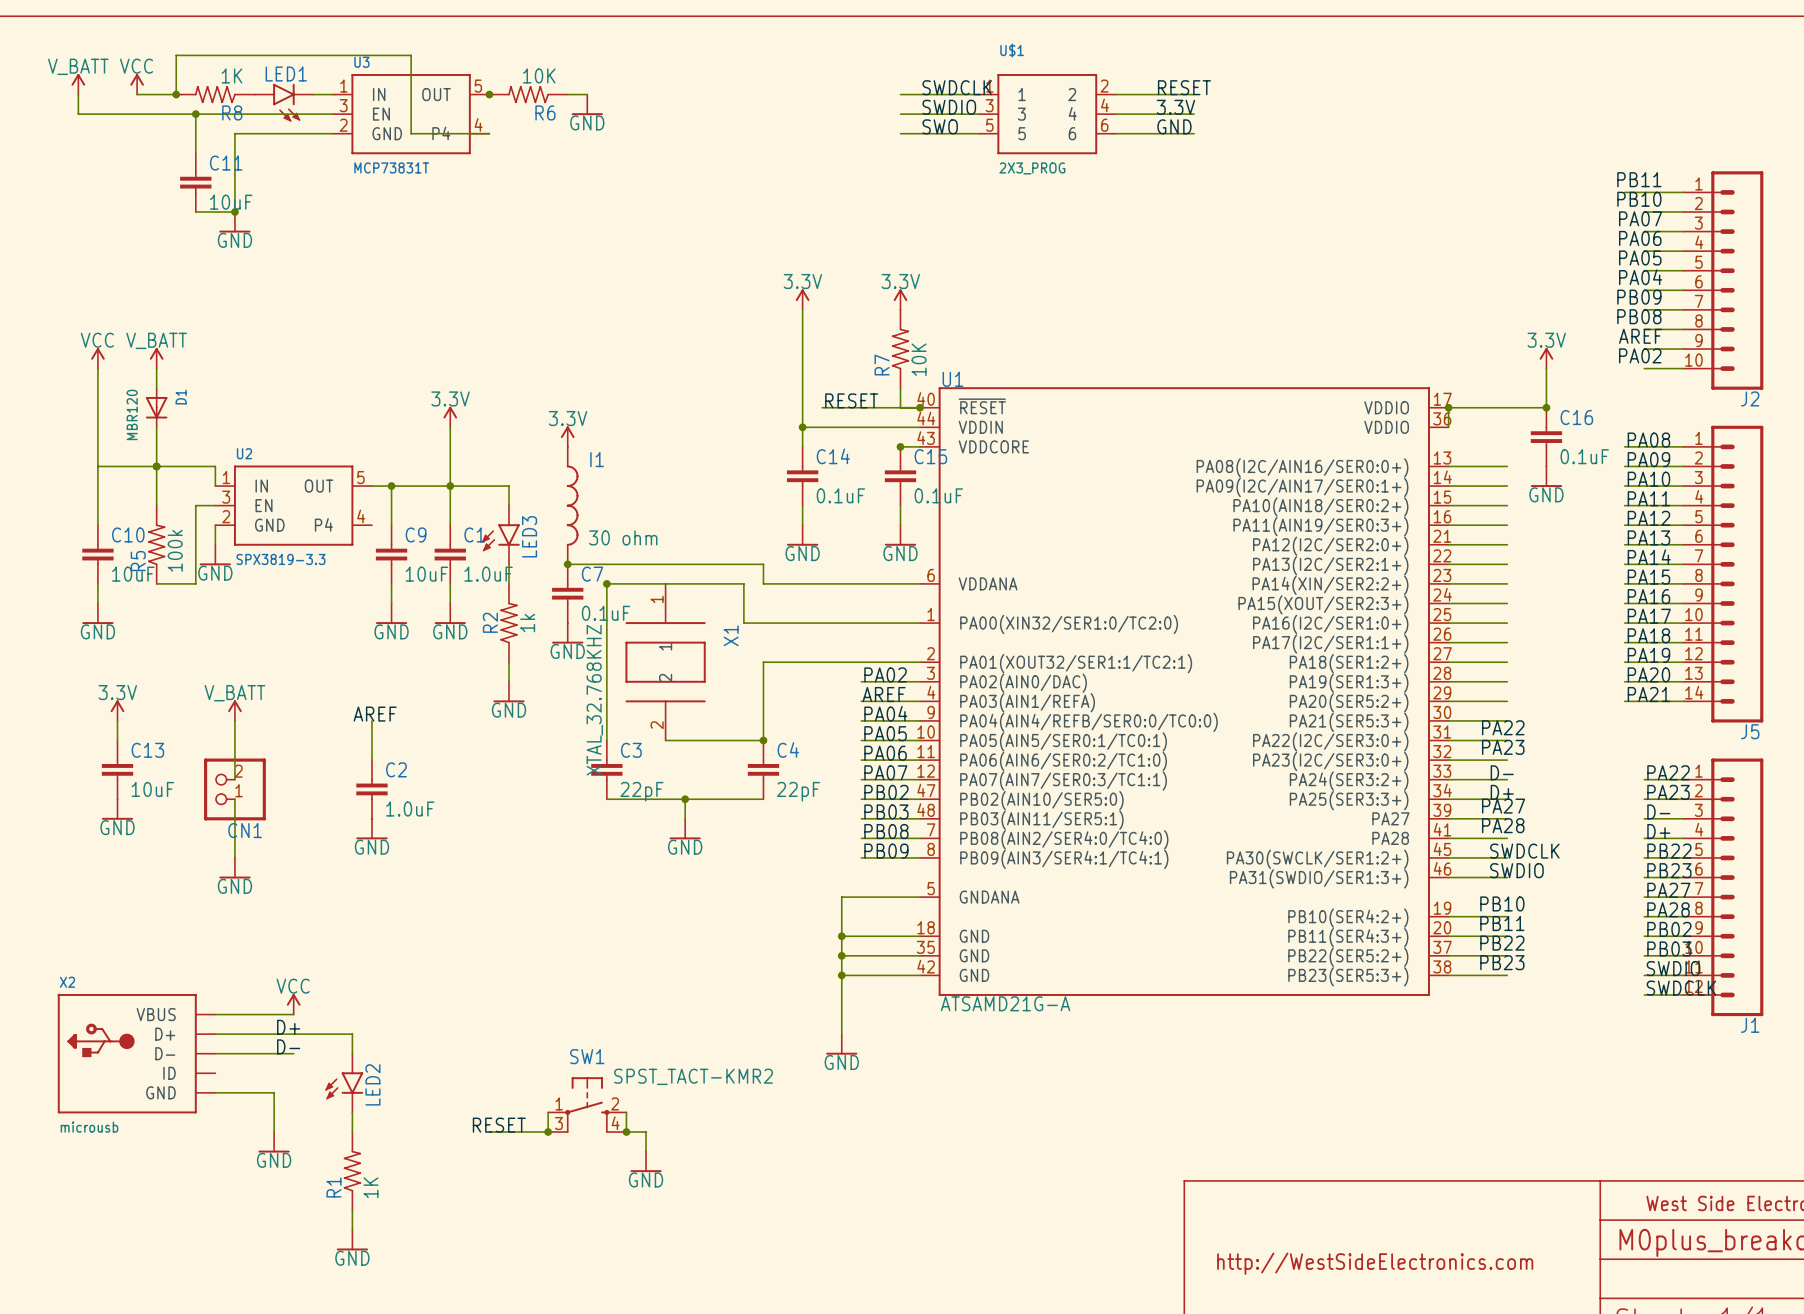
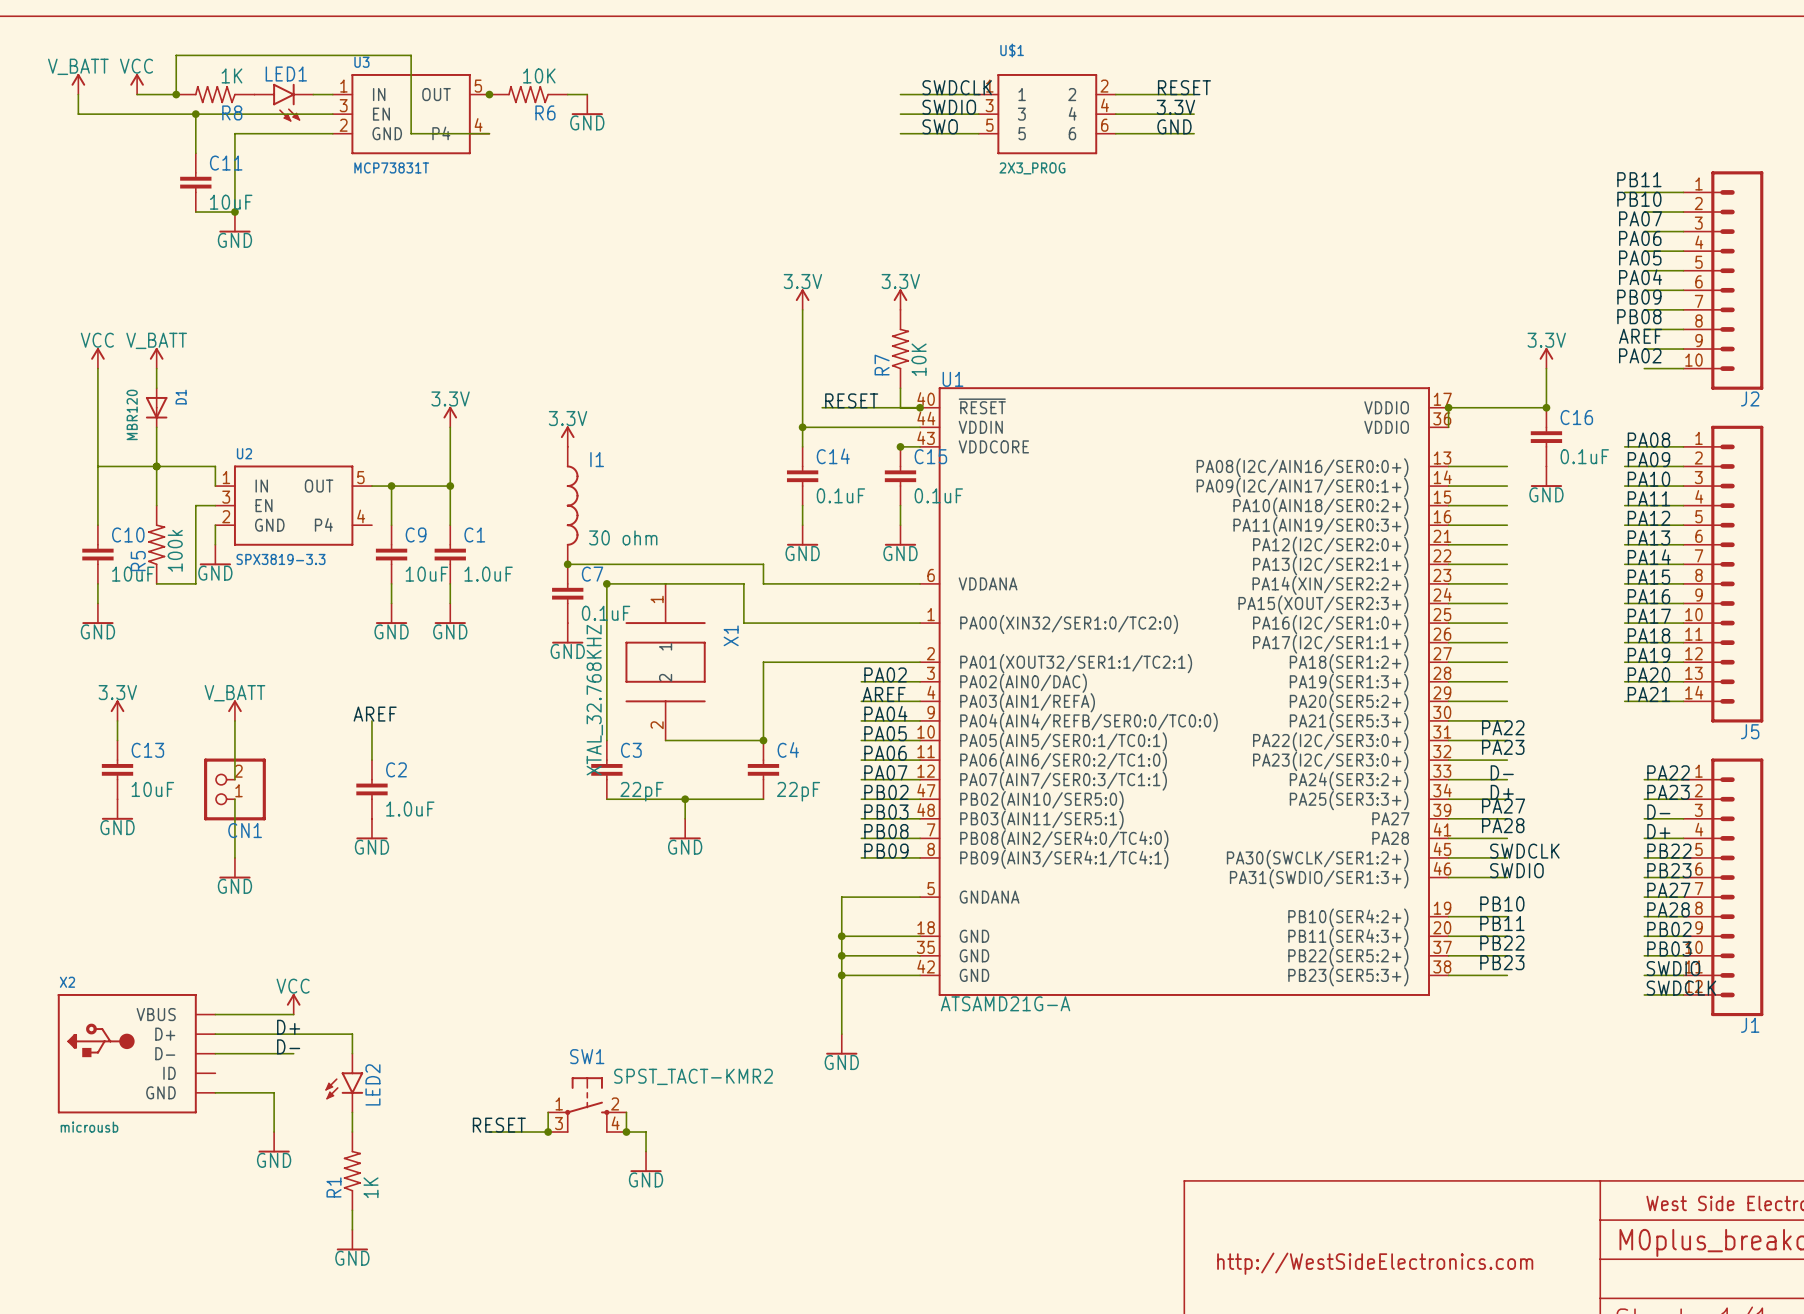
wire: (450, 486) (509, 486) (509, 505) -> none
LED3: (500, 534) -> none
wire: (509, 564) (509, 583) -> none
R2: 1k (509, 623) -> none
wire: (509, 662) (509, 681) -> none
power symbol: GND (509, 692) -> none

